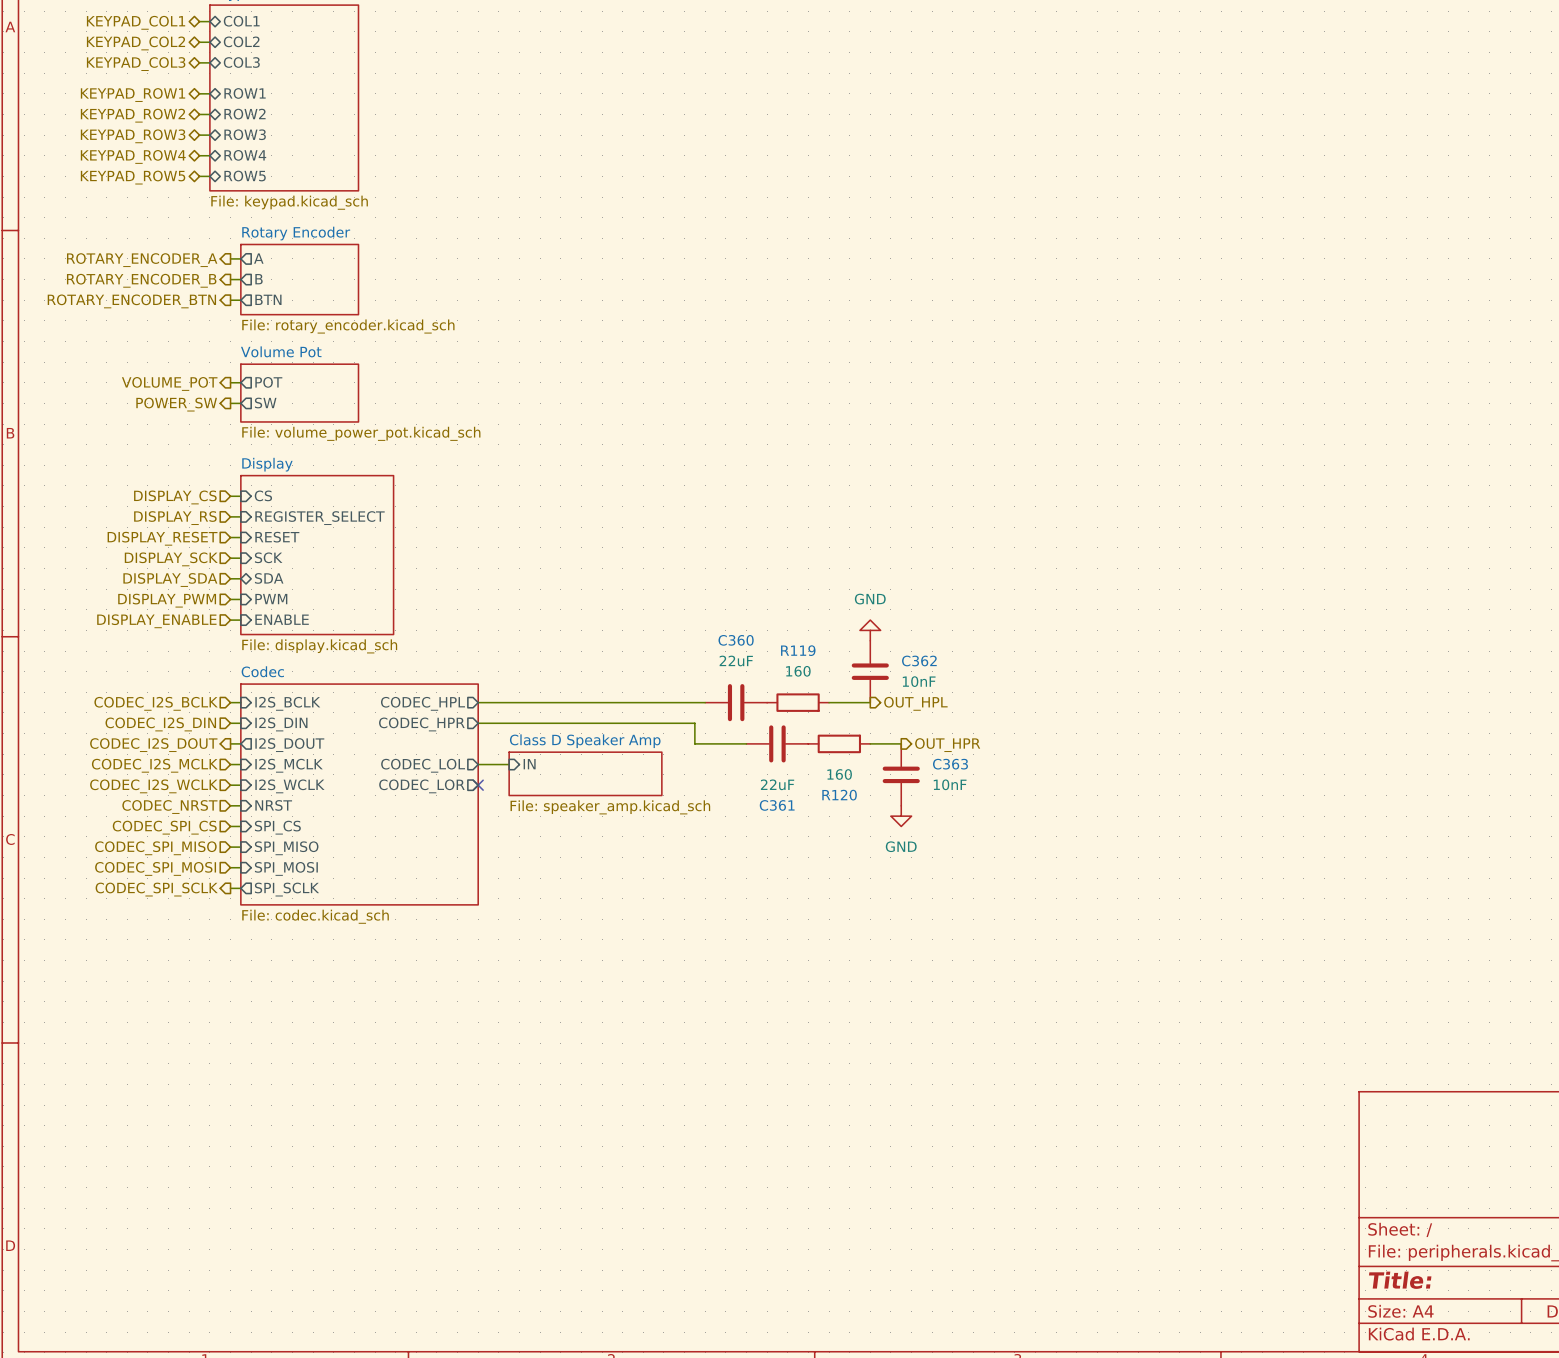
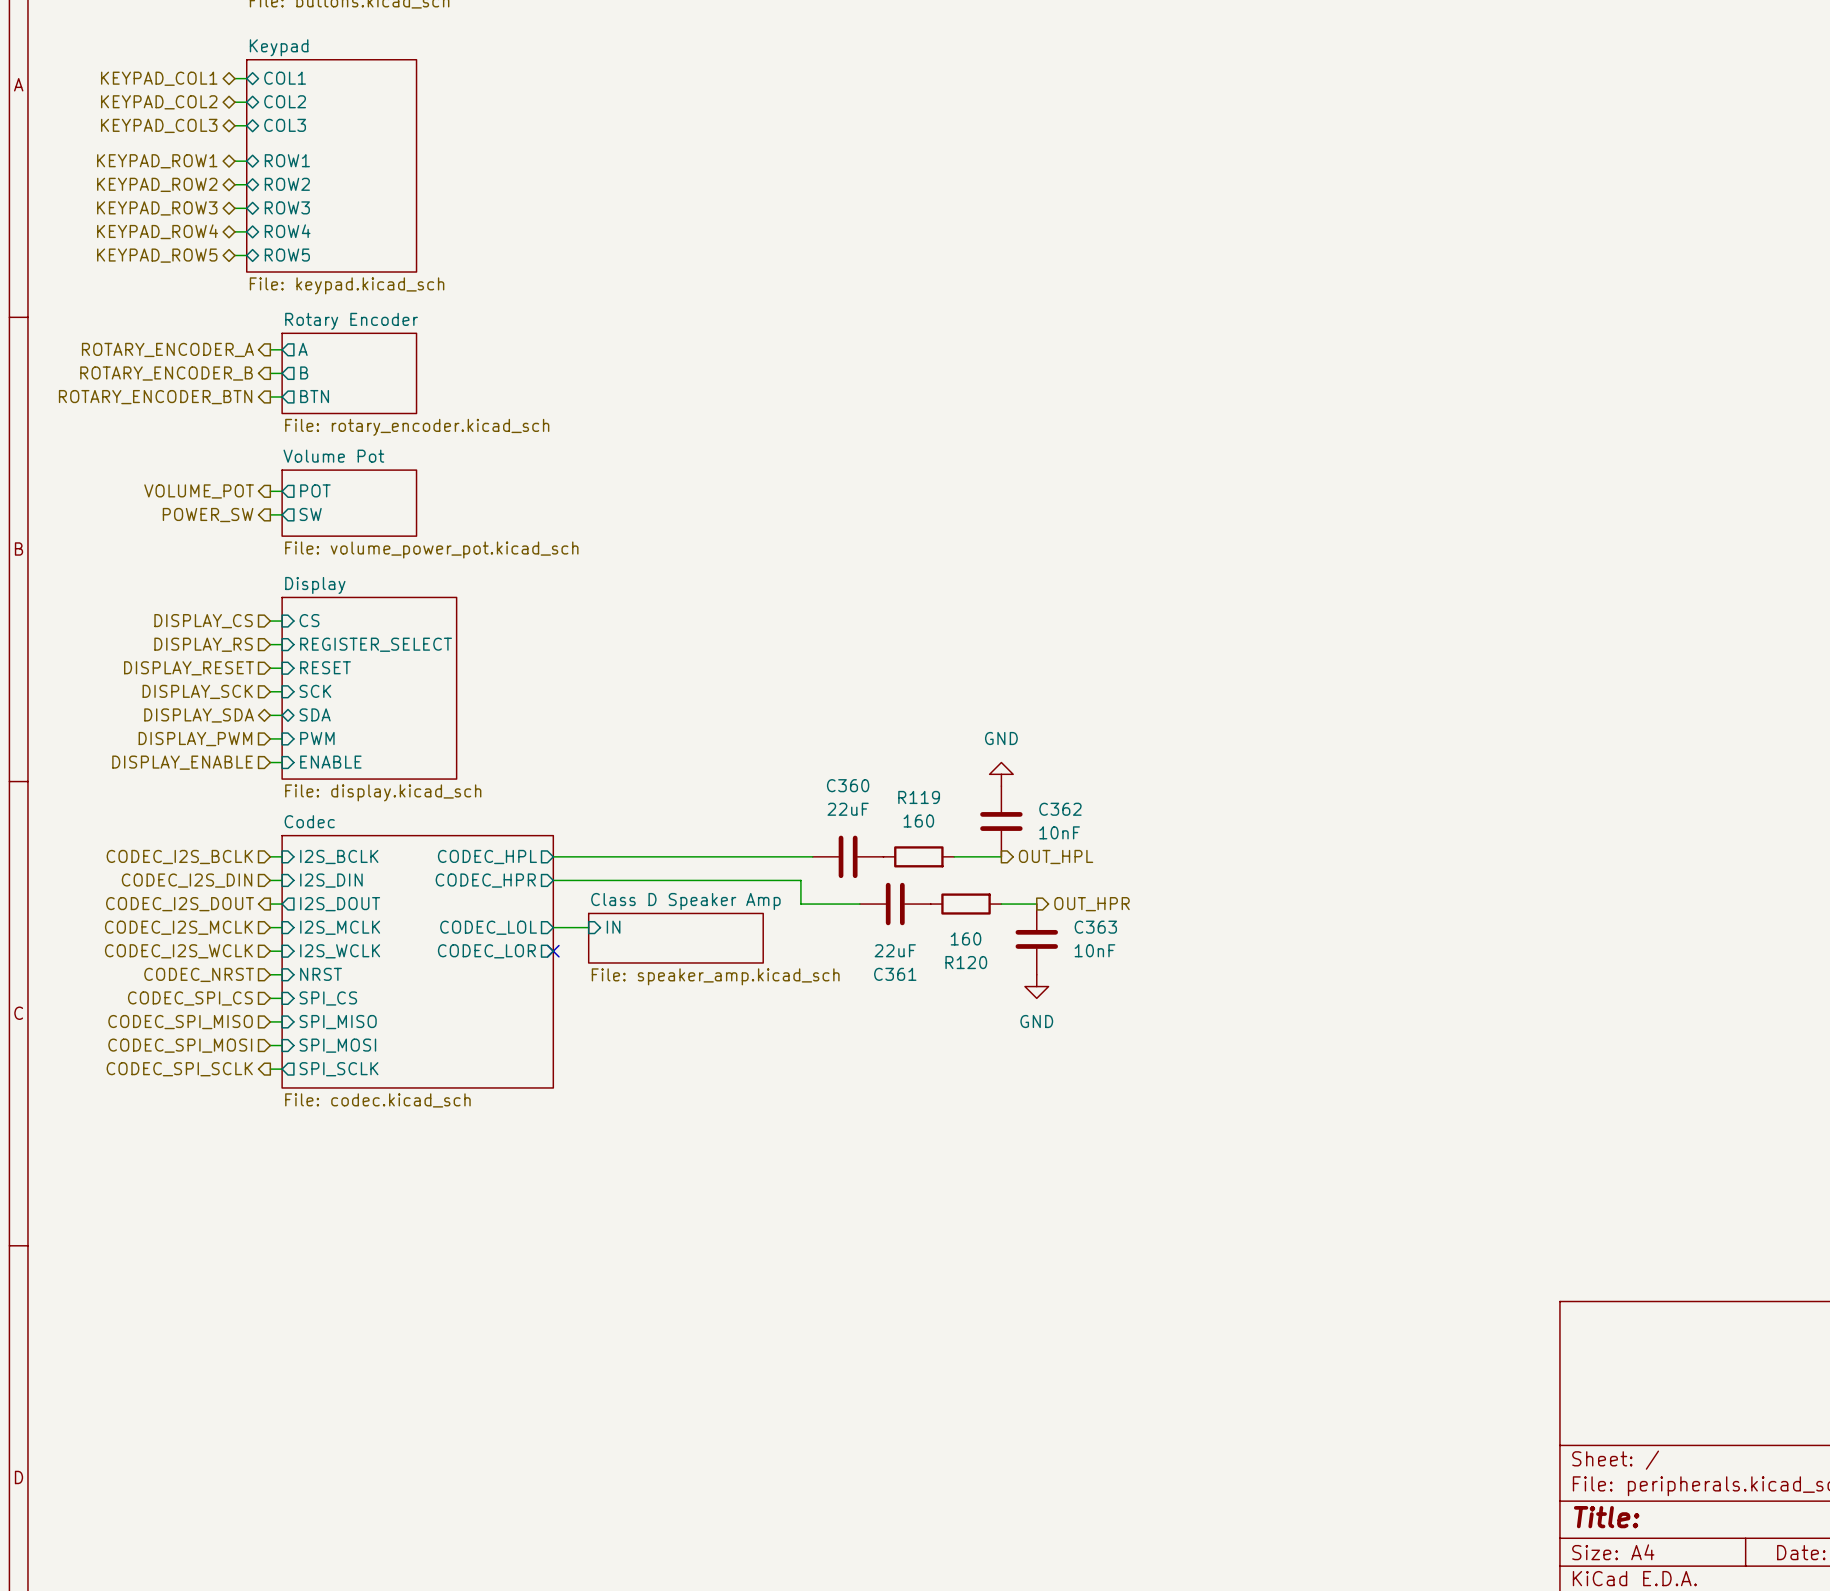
hierarchical label shape: input (170, 580) -> bidirectional (199, 715)

